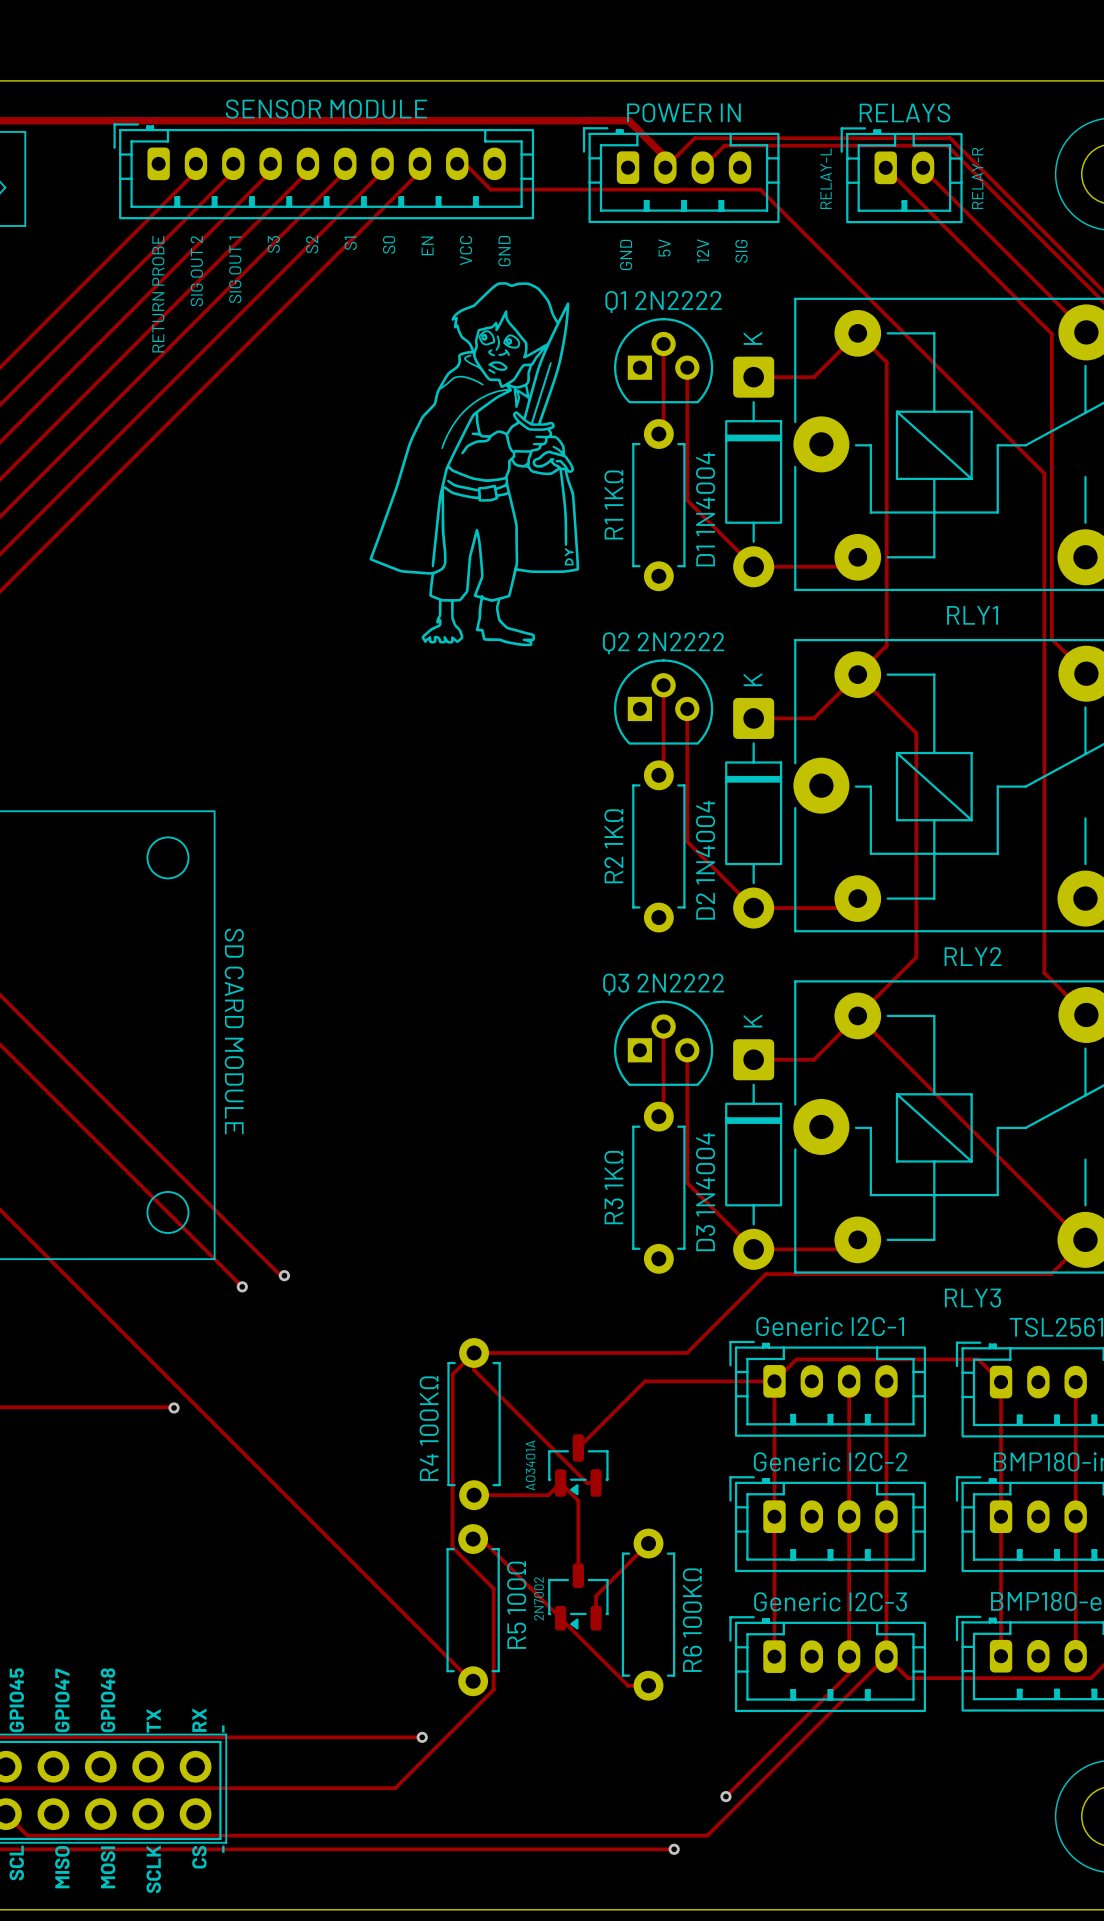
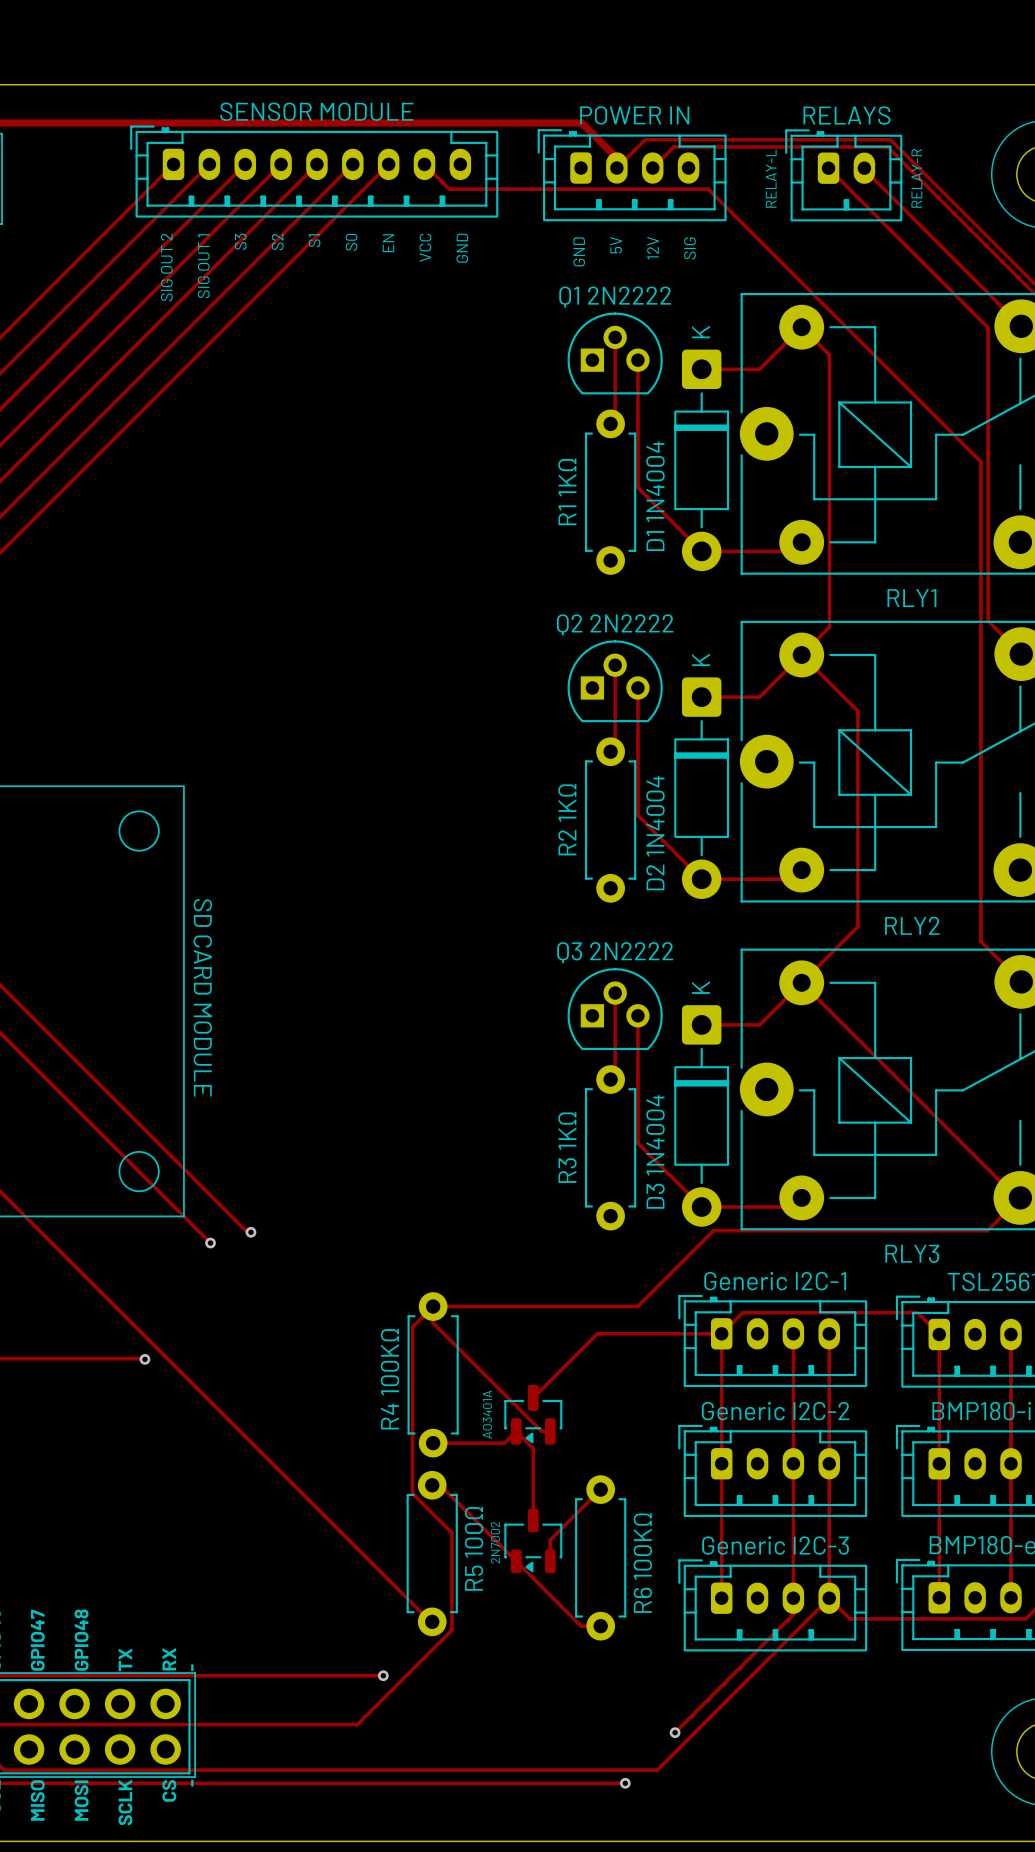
SENSOR MODULE: (323, 171) -> none
SENSOR MODULE: none -> (314, 171)
drawing: [369, 282, 580, 647] -> none
text: RETURN PROBE (158, 294) -> none

